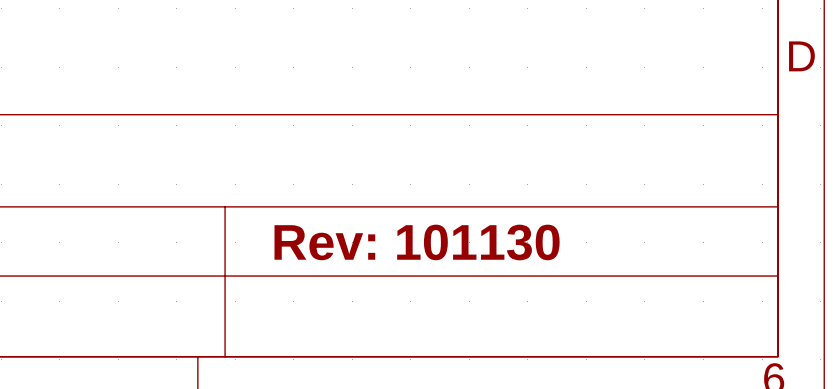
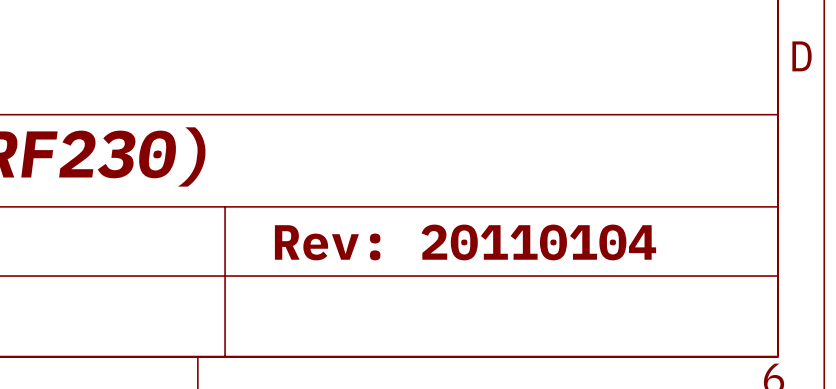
title block: Rev: 101130 (417, 242) -> Rev: 20110104 (465, 242)

